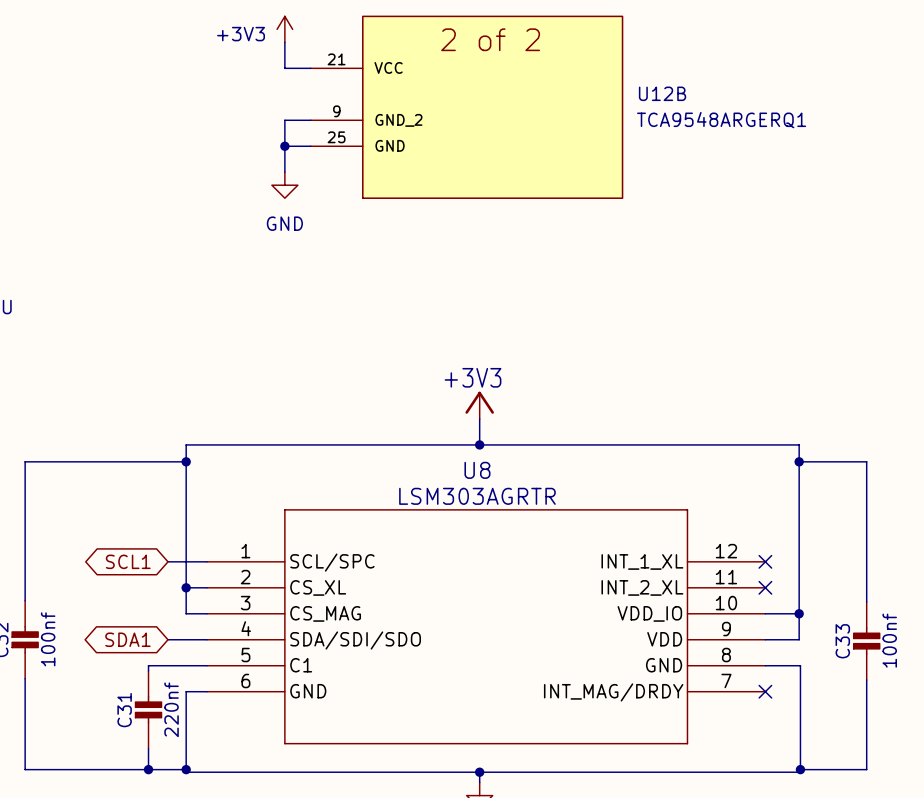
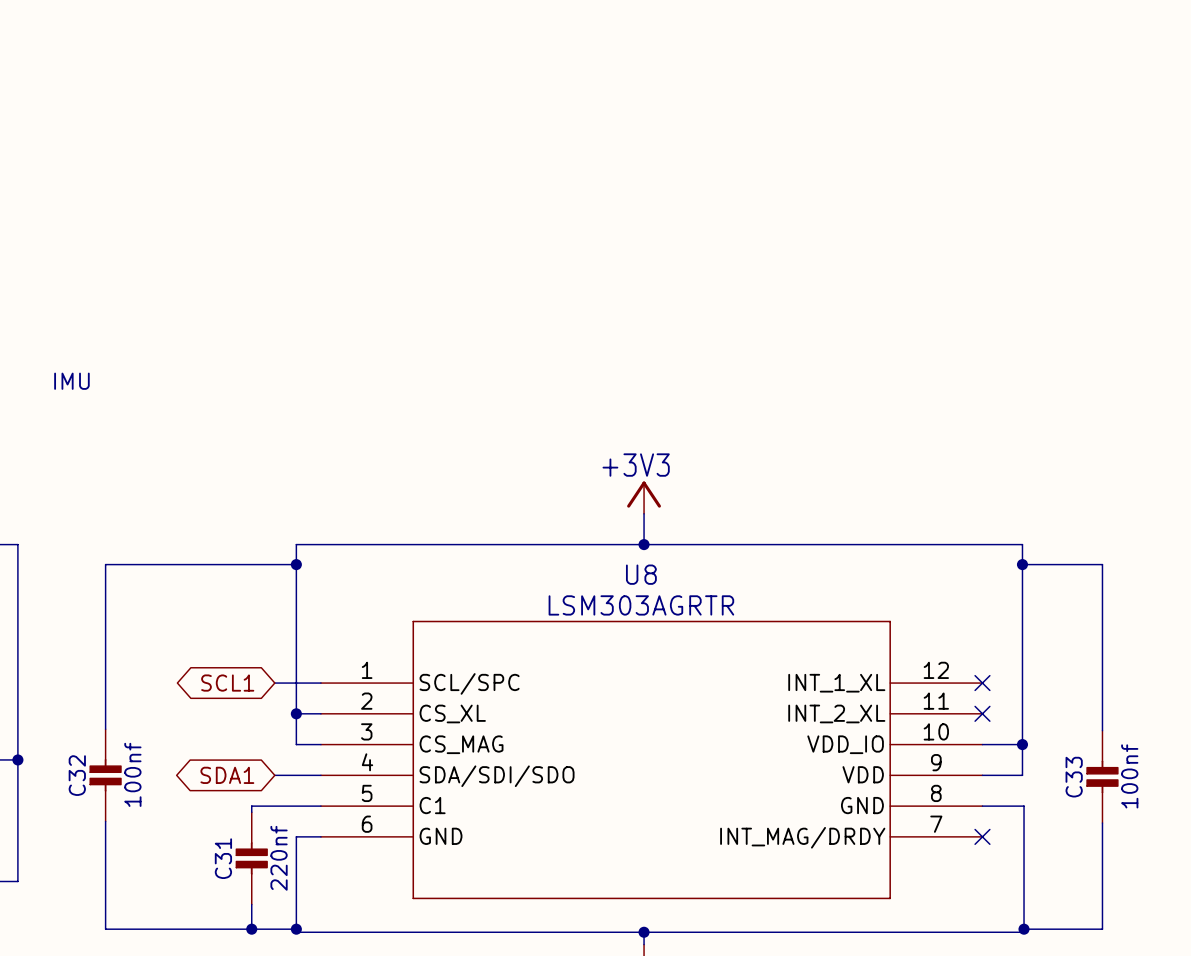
power symbol: +3V3 (284, 29) -> none
wire: (284, 42) (284, 68) (310, 68) -> none
U12B: TCA9548ARGERQ1 (467, 107) -> none
wire: (310, 120) (284, 120) (284, 172) -> none
wire: (284, 146) (310, 146) -> none
junction: (284, 146) -> none
power symbol: GND (284, 185) -> none

